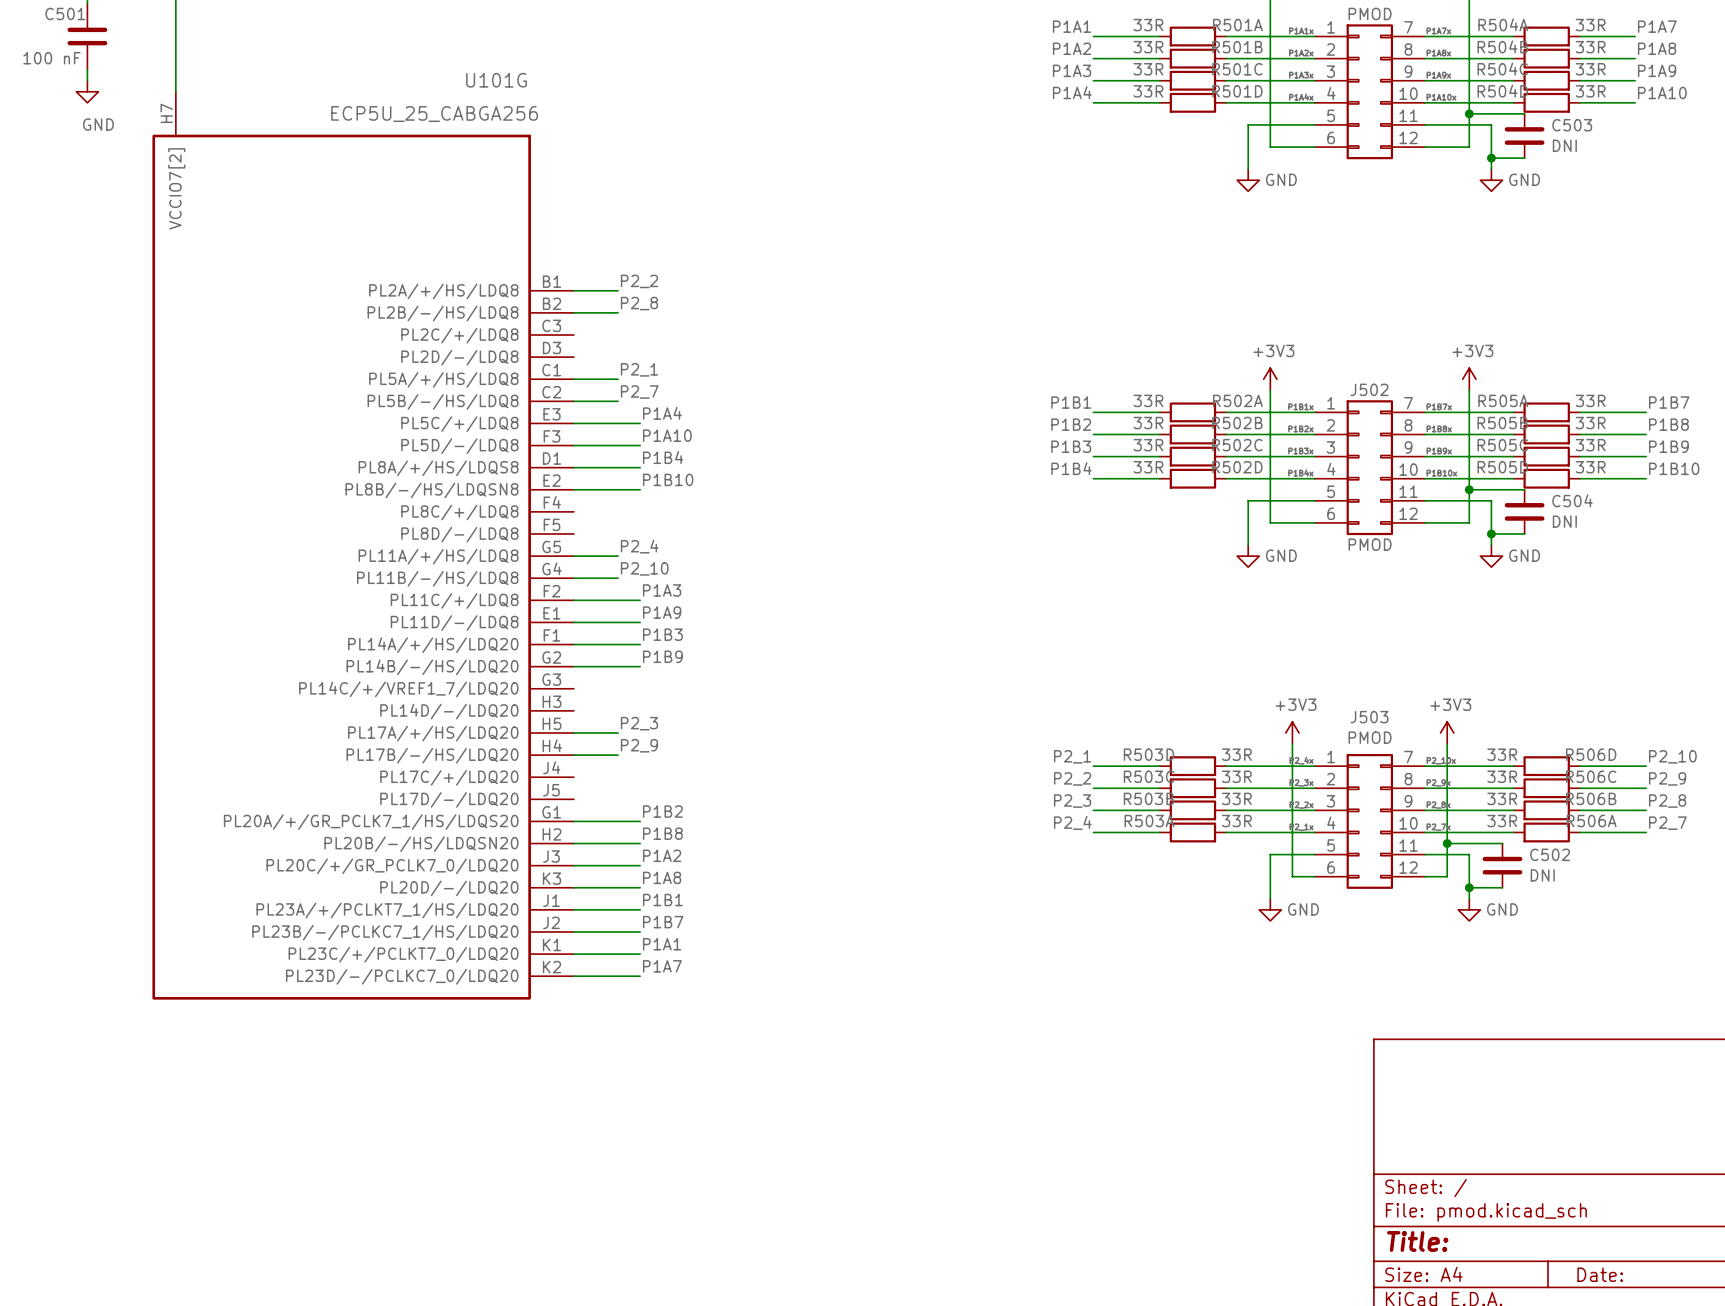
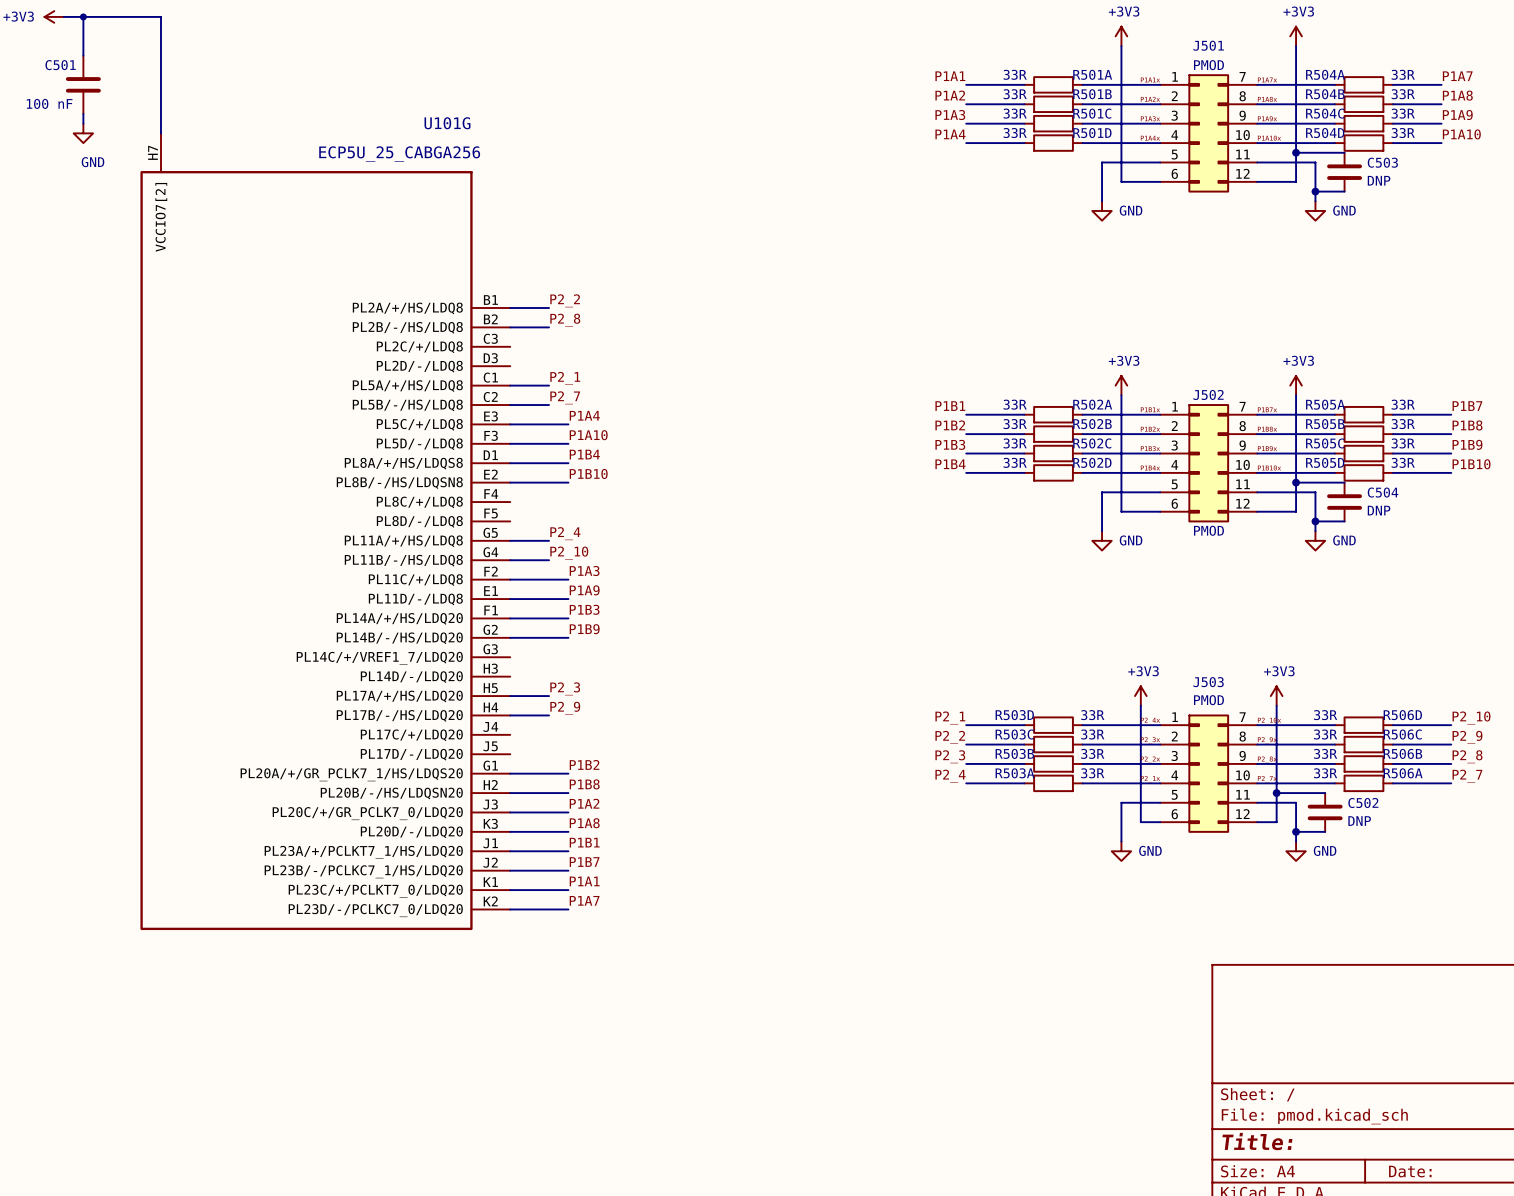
C503 value: DNI (1564, 145) -> DNP (1379, 180)
C504 value: DNI (1564, 521) -> DNP (1379, 510)
C502 value: DNI (1542, 875) -> DNP (1359, 821)

